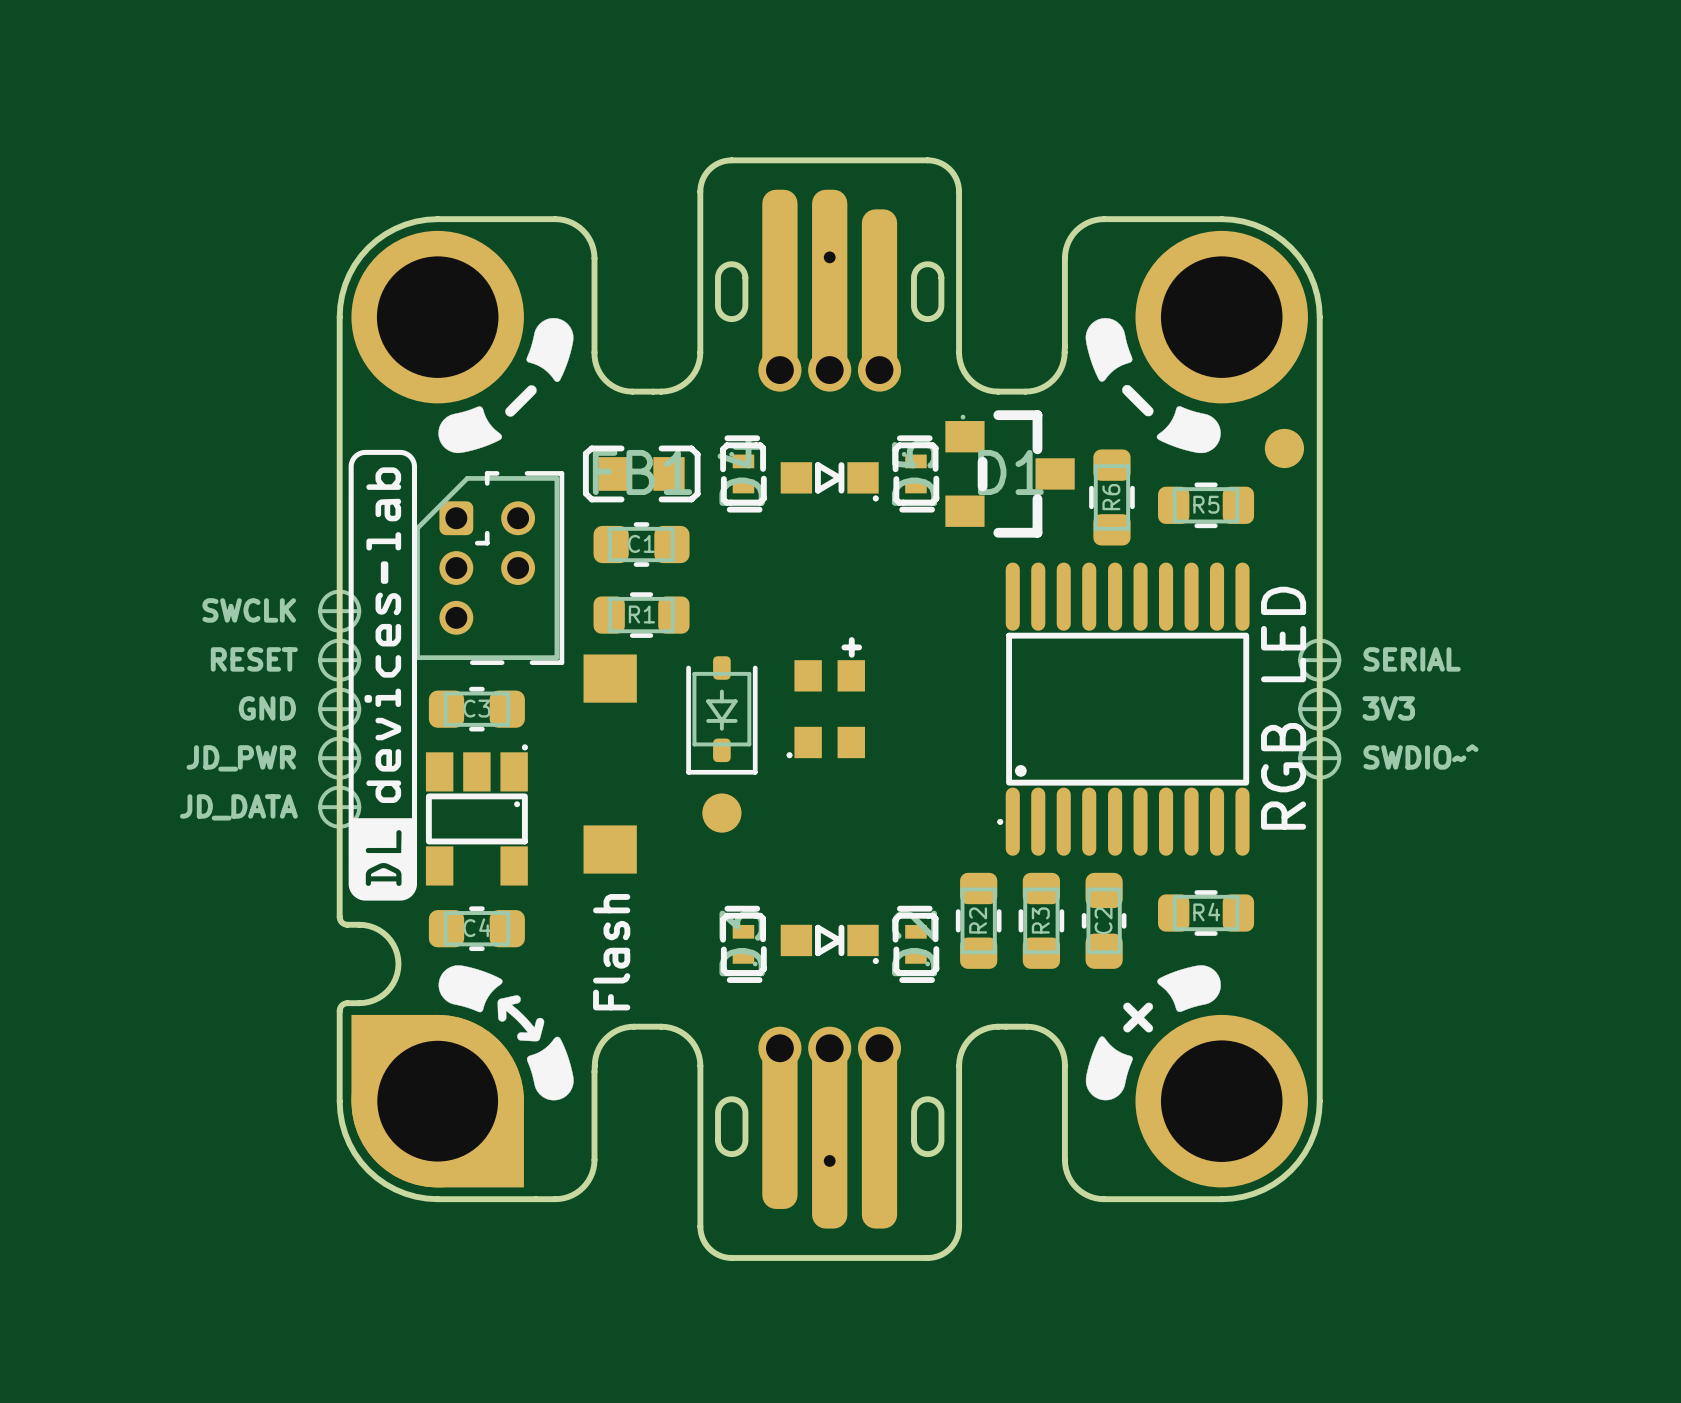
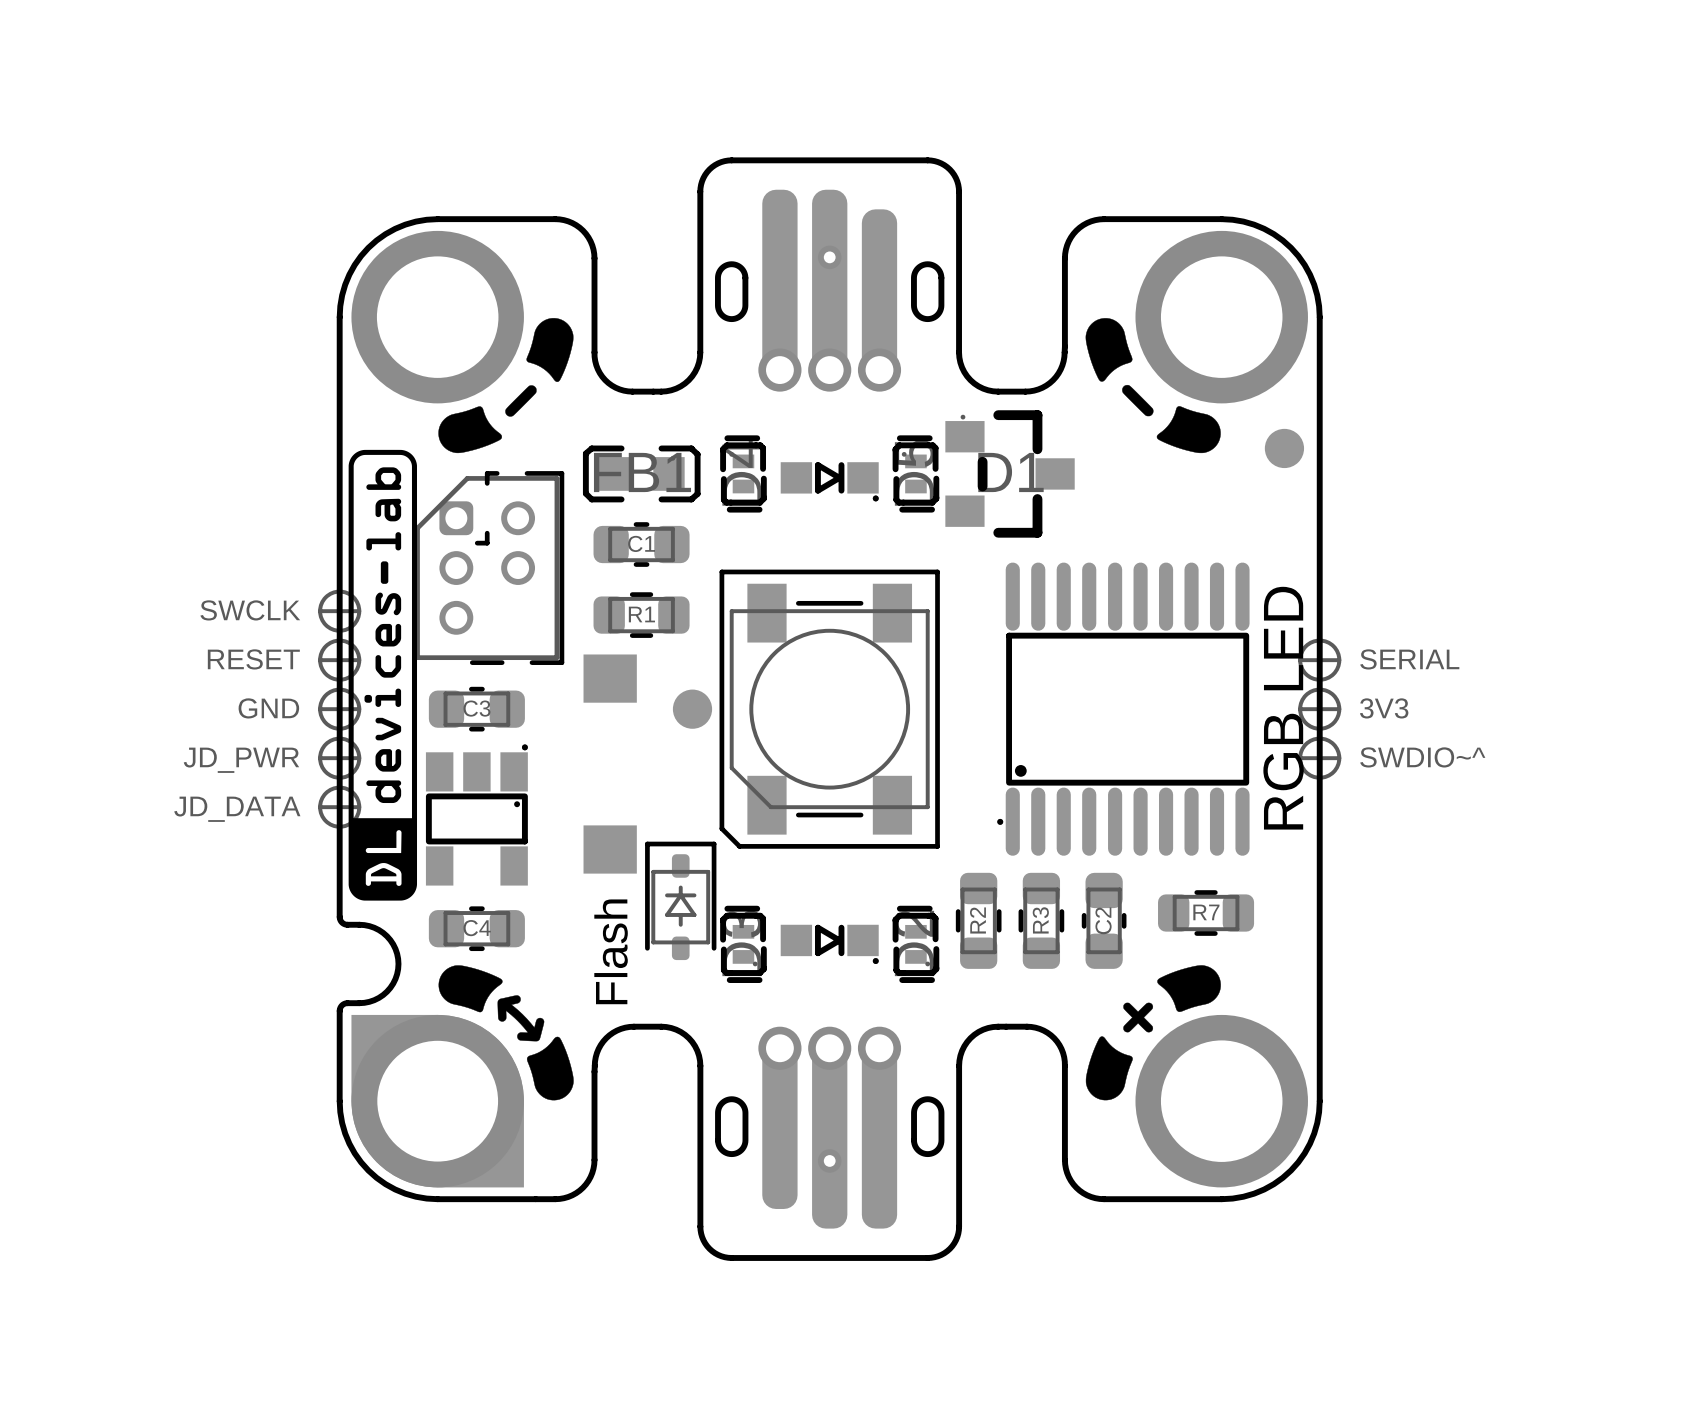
R6: (1111, 497) -> none
R5: (1206, 505) -> none
part footprint: [786, 637, 865, 759] -> [719, 569, 940, 849]
part footprint: [686, 656, 758, 775] -> [672, 689, 713, 729]
part: (721, 813) -> none
part: none -> (680, 900)
R4 name: R4 (1206, 912) -> R7 (1206, 912)

